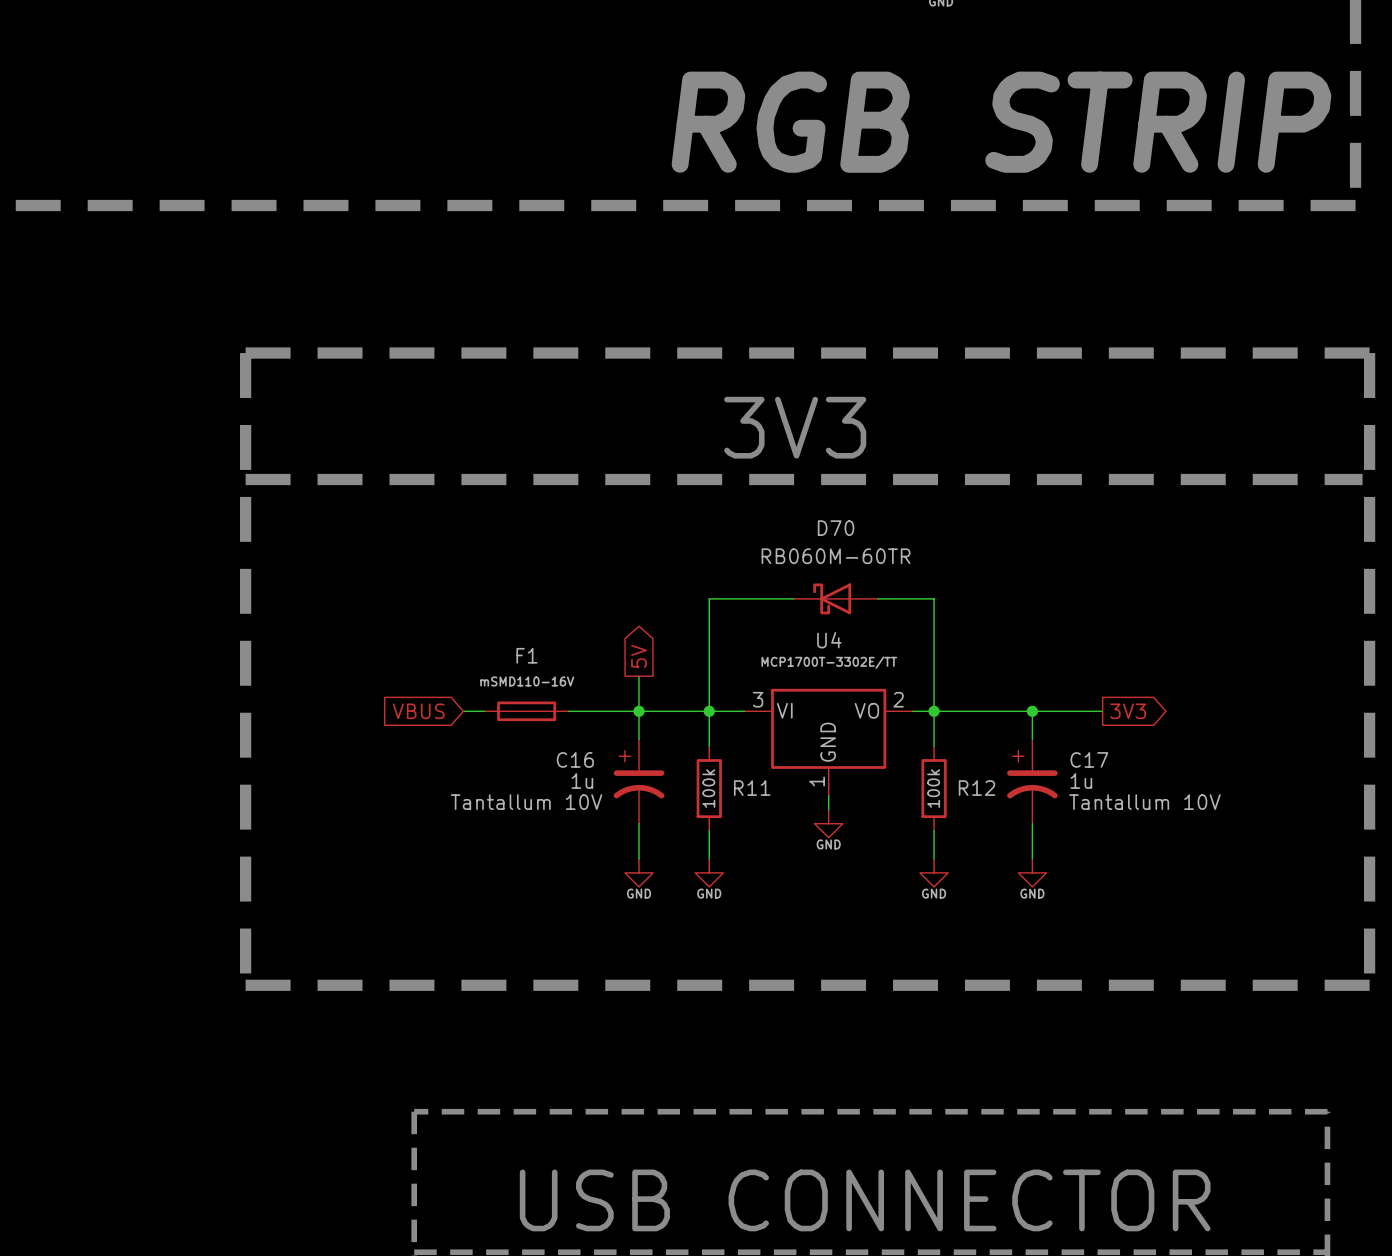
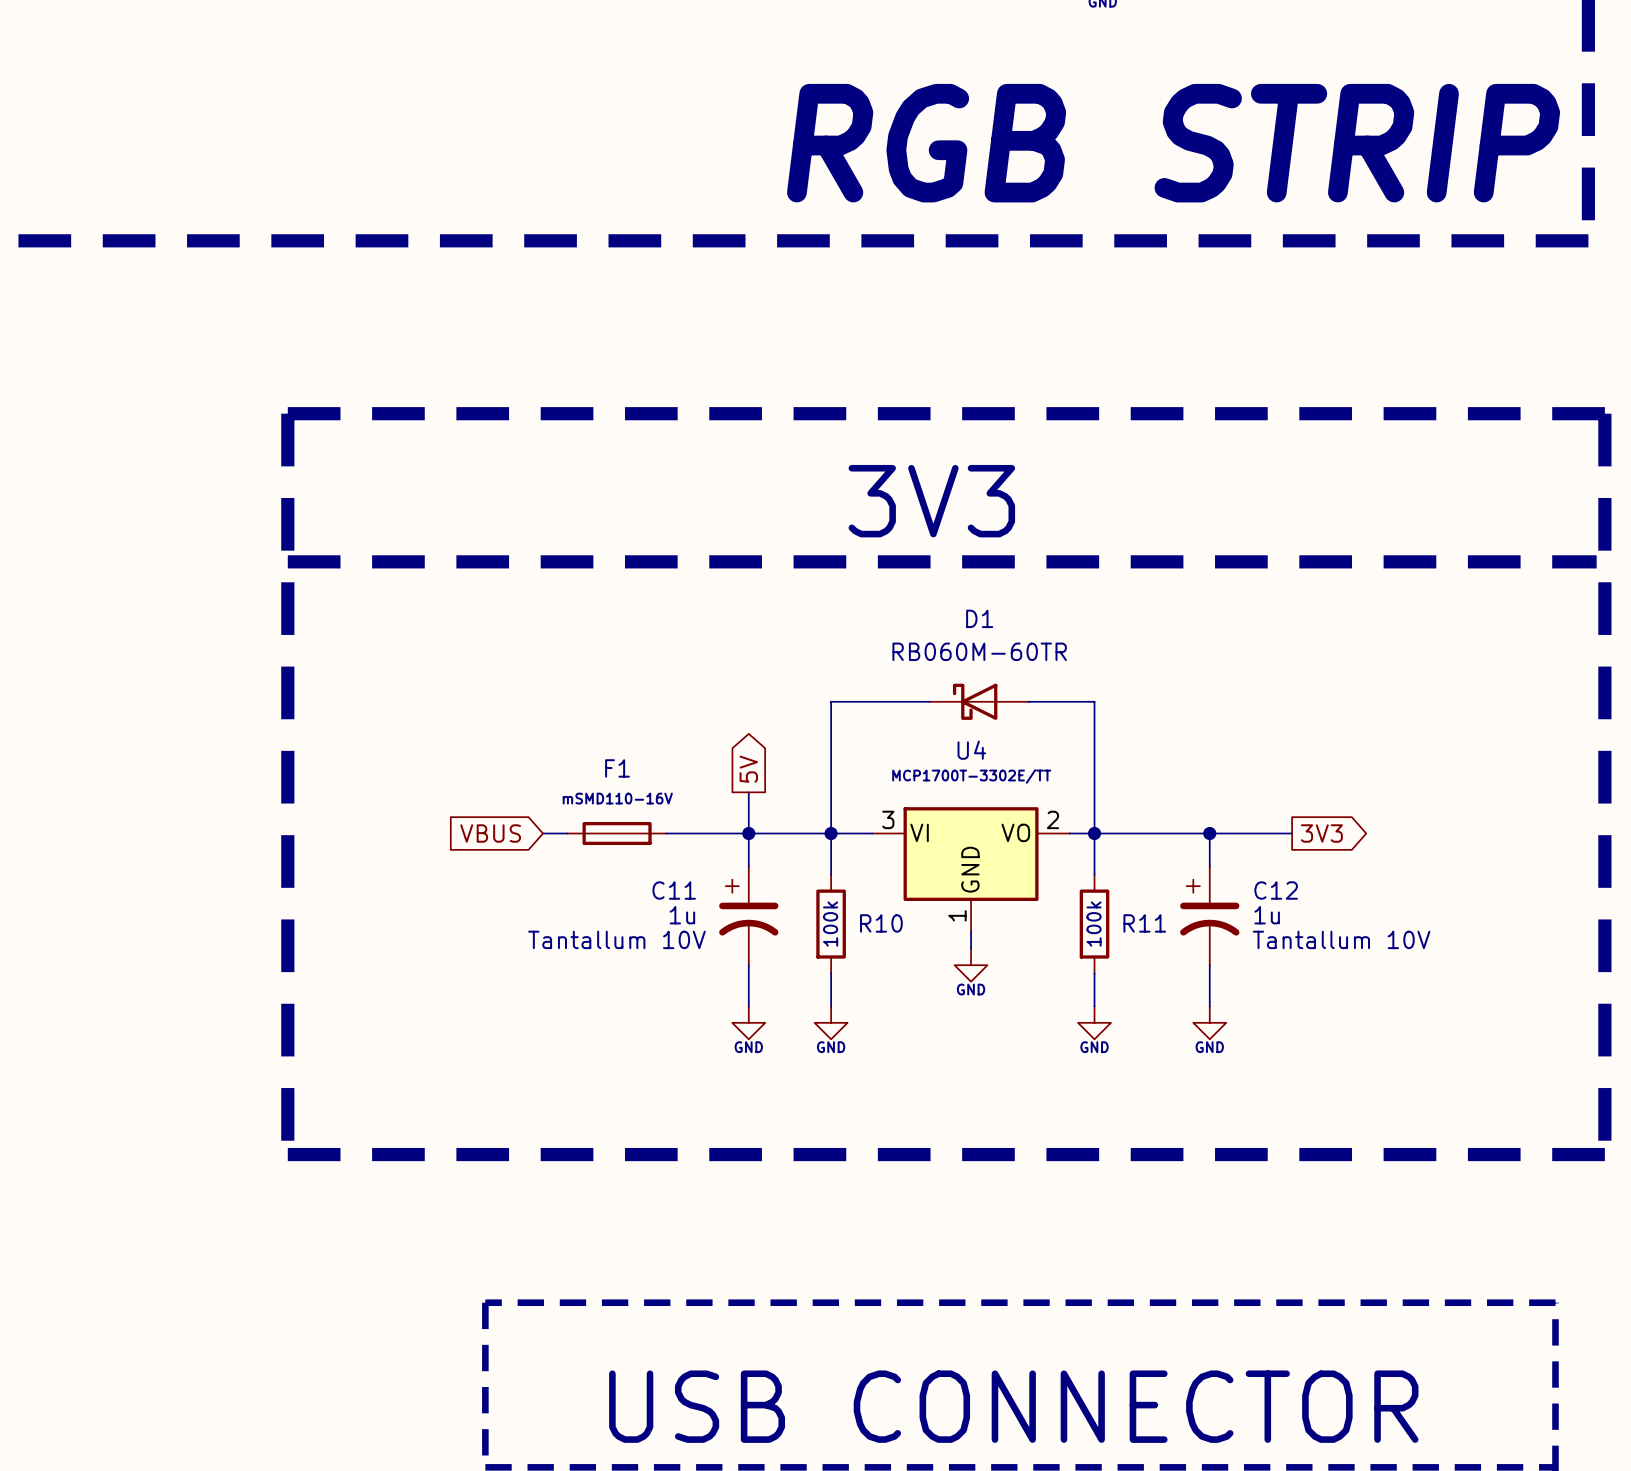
D70 name: D70 (836, 528) -> D1 (979, 618)
C16 name: C16 (575, 759) -> C11 (674, 890)
C17 name: C17 (1089, 759) -> C12 (1276, 890)
R11 name: R11 (752, 788) -> R10 (881, 923)
R12 name: R12 (976, 788) -> R11 (1144, 923)

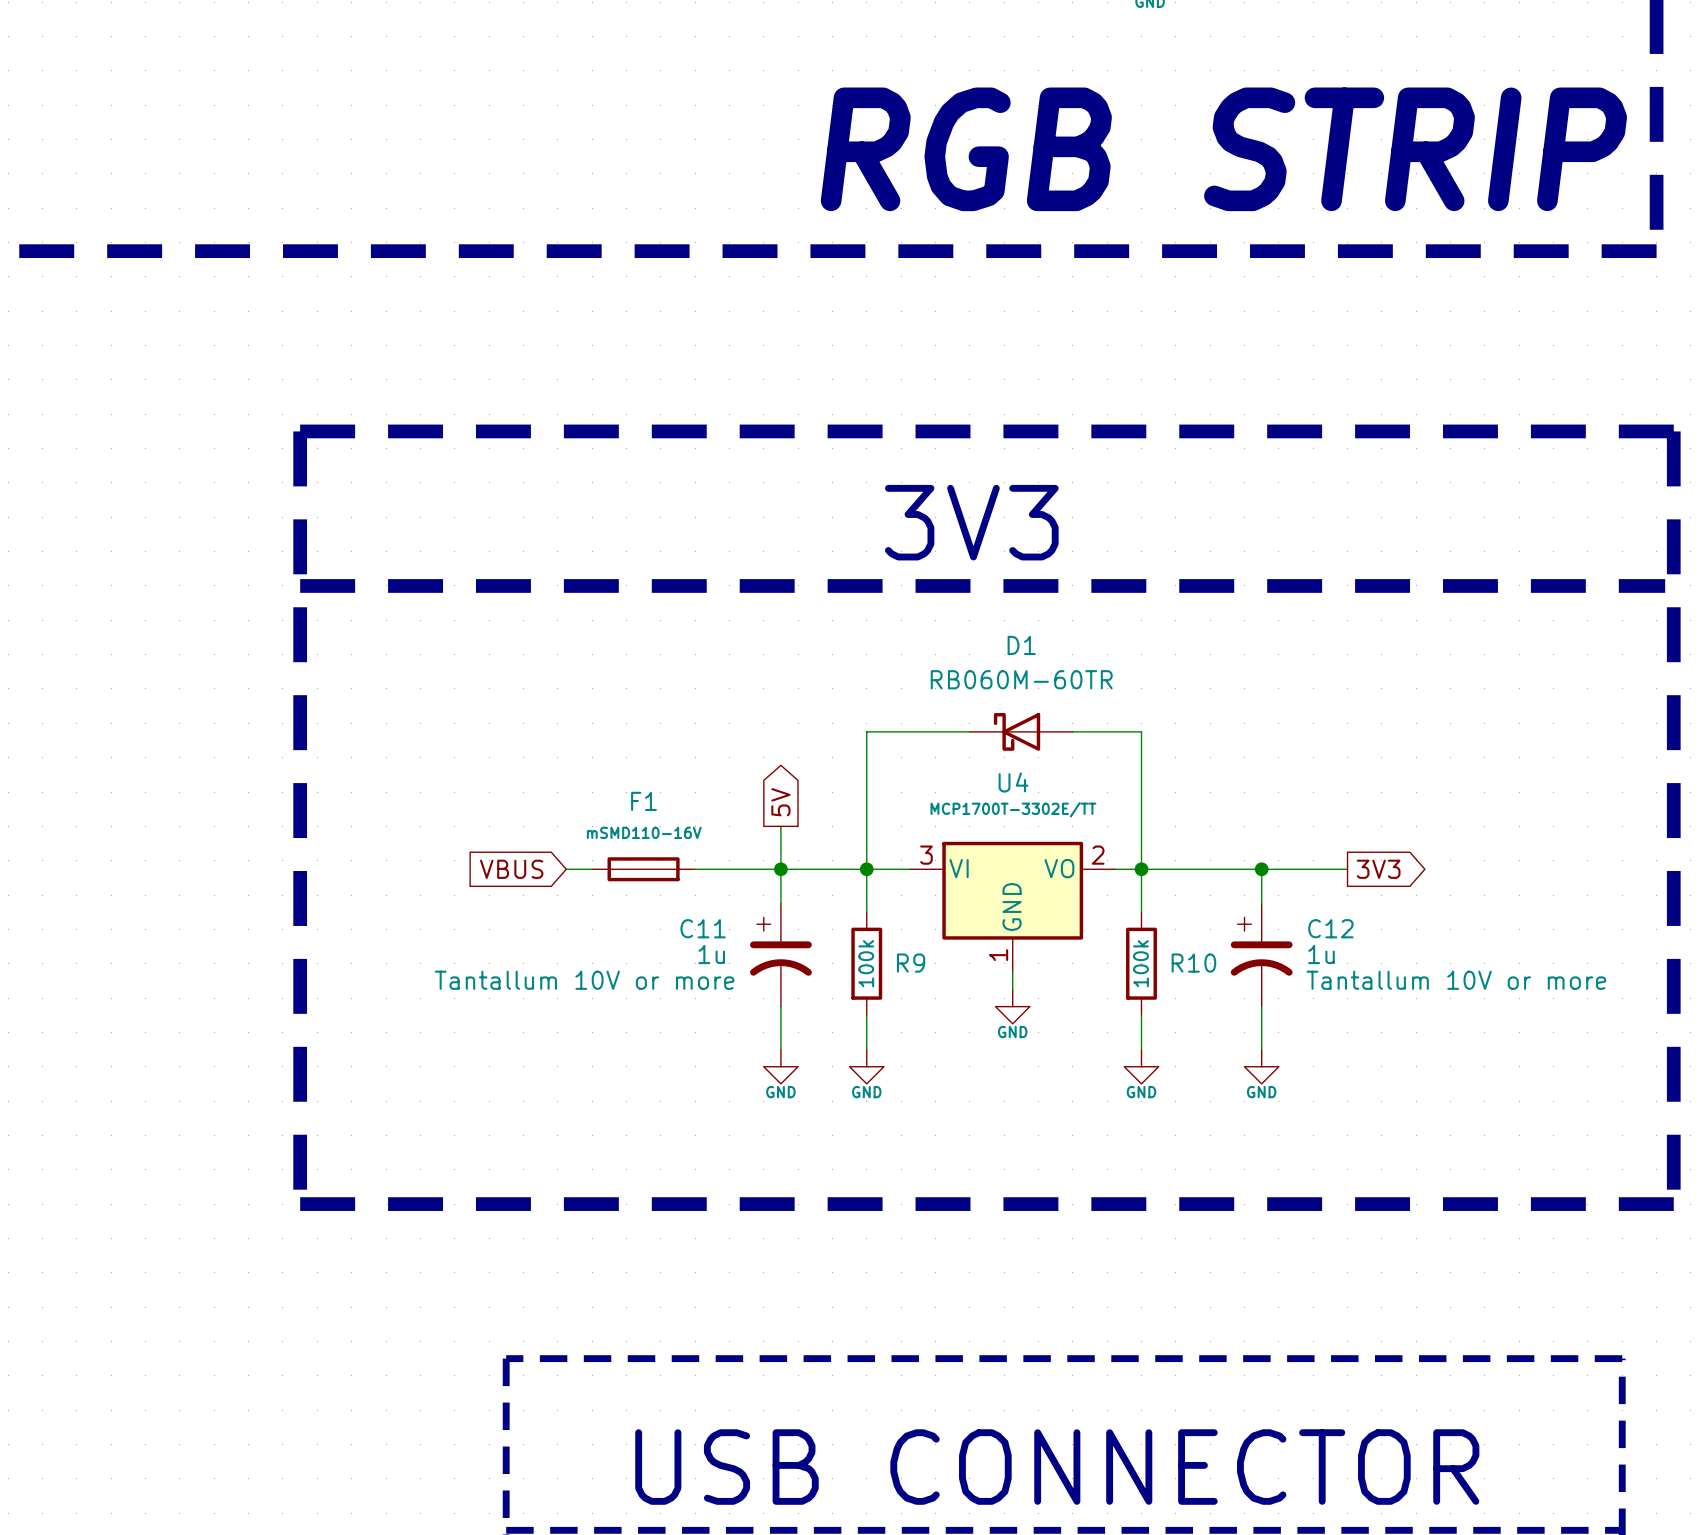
R10 name: R10 (881, 923) -> R9 (911, 963)
R11 name: R11 (1144, 923) -> R10 (1193, 963)
C11 text: Tantallum 10V (616, 939) -> Tantallum 10V or more (584, 980)
C12 text: Tantallum 10V (1341, 939) -> Tantallum 10V or more (1456, 980)

